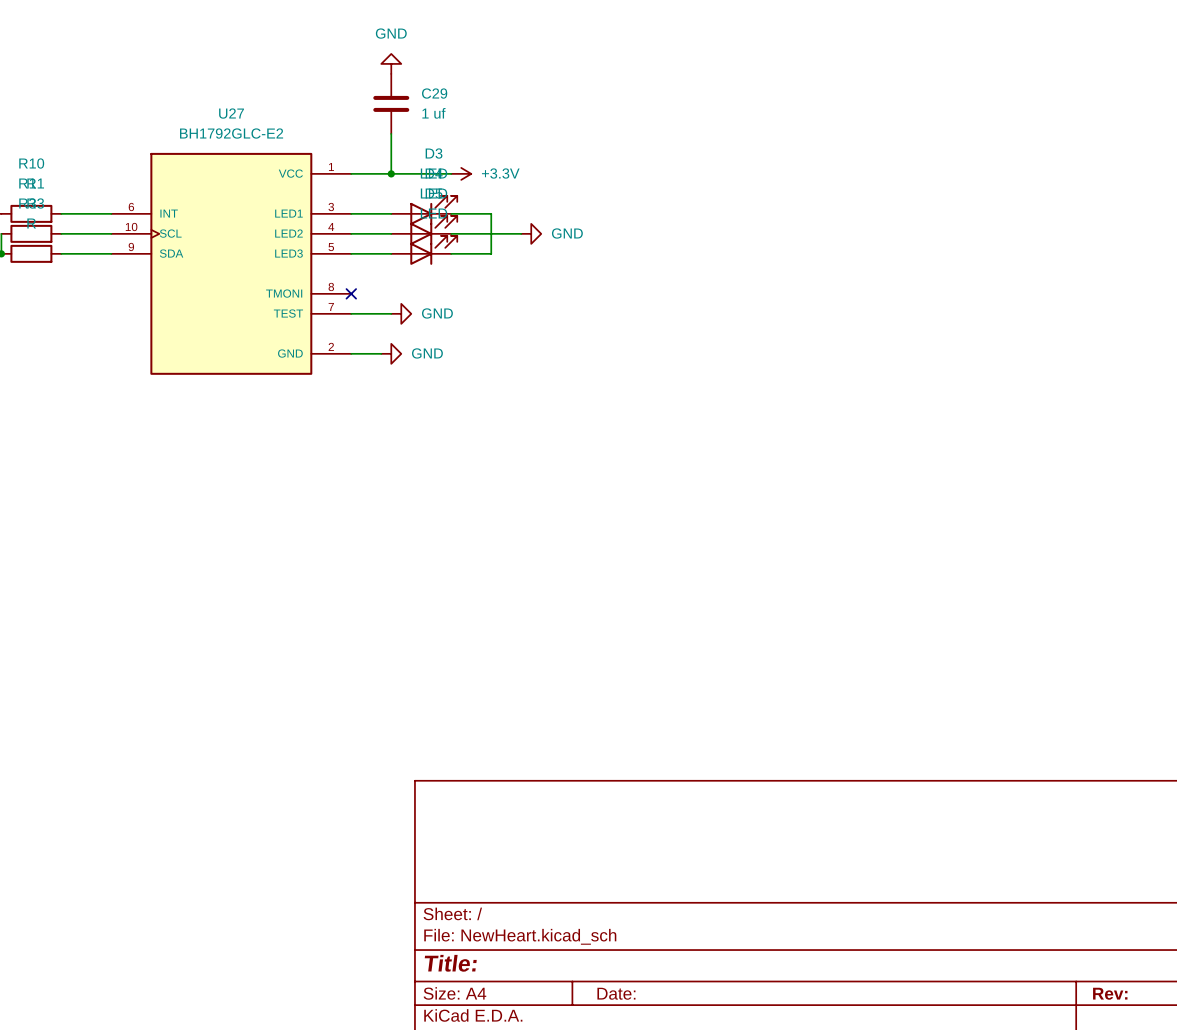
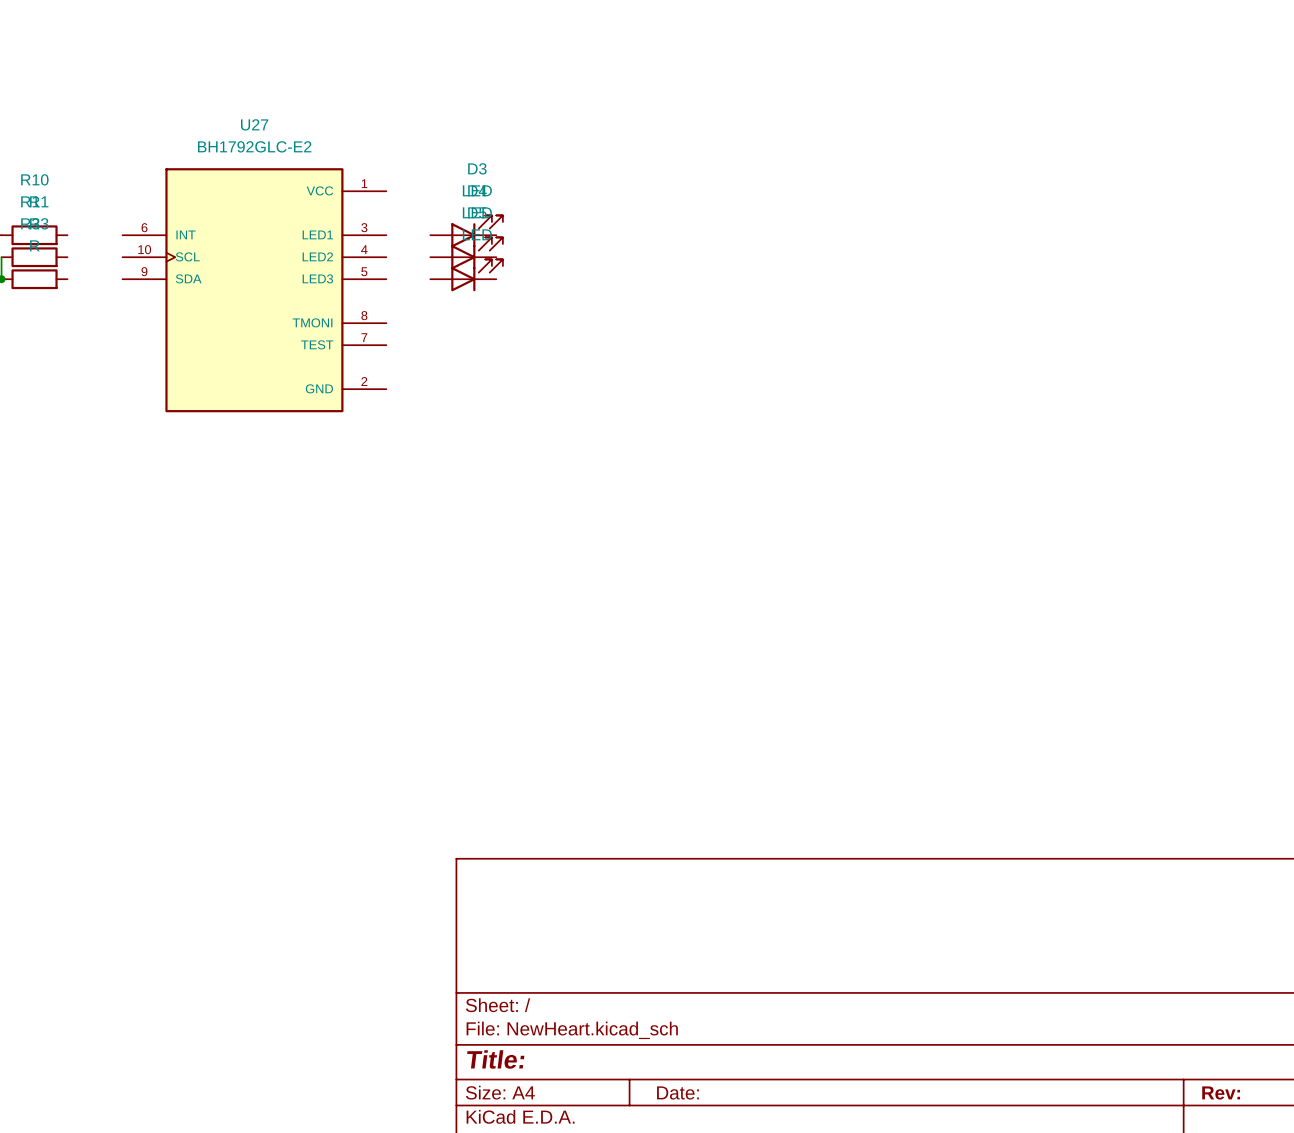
power symbol: GND (391, 63) -> none
C29: 1 uf (391, 103) -> none
wire: (391, 133) (391, 173) -> none
wire: (351, 173) (451, 173) -> none
junction: (391, 173) -> none
power symbol: +3.3V (461, 173) -> none
wire: (61, 213) (111, 213) -> none
wire: (351, 213) (391, 213) -> none
wire: (451, 213) (491, 213) (491, 253) (451, 253) -> none
wire: (61, 233) (111, 233) -> none
wire: (351, 233) (391, 233) -> none
wire: (451, 233) (521, 233) -> none
power symbol: GND (531, 233) -> none
wire: (61, 253) (111, 253) -> none
wire: (351, 253) (391, 253) -> none
no-connect mark: (351, 293) -> none
wire: (351, 313) (391, 313) -> none
power symbol: GND (401, 313) -> none
wire: (351, 353) (381, 353) -> none
power symbol: GND (391, 353) -> none

